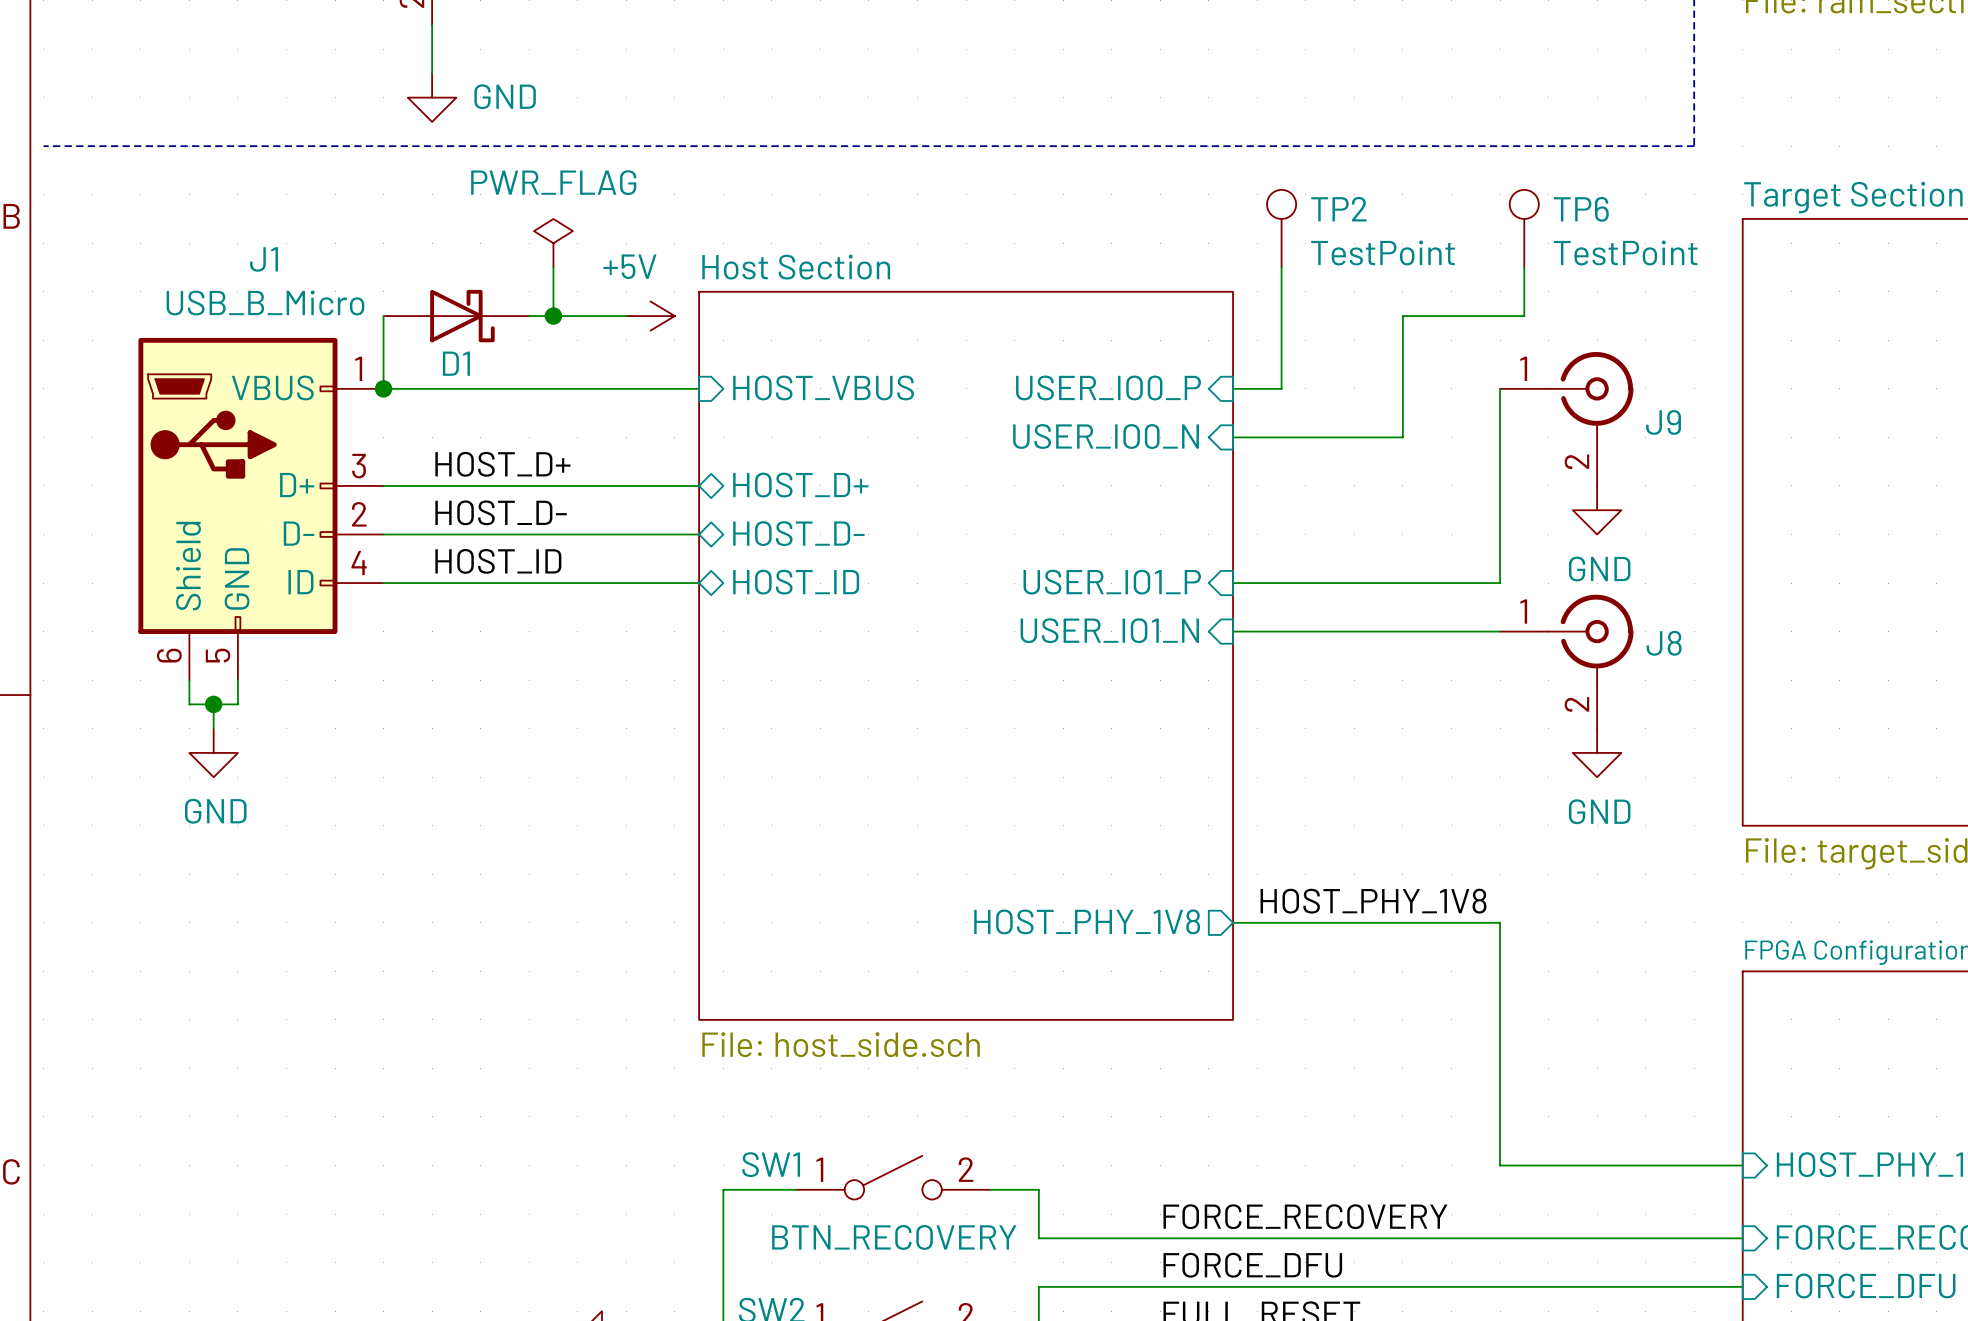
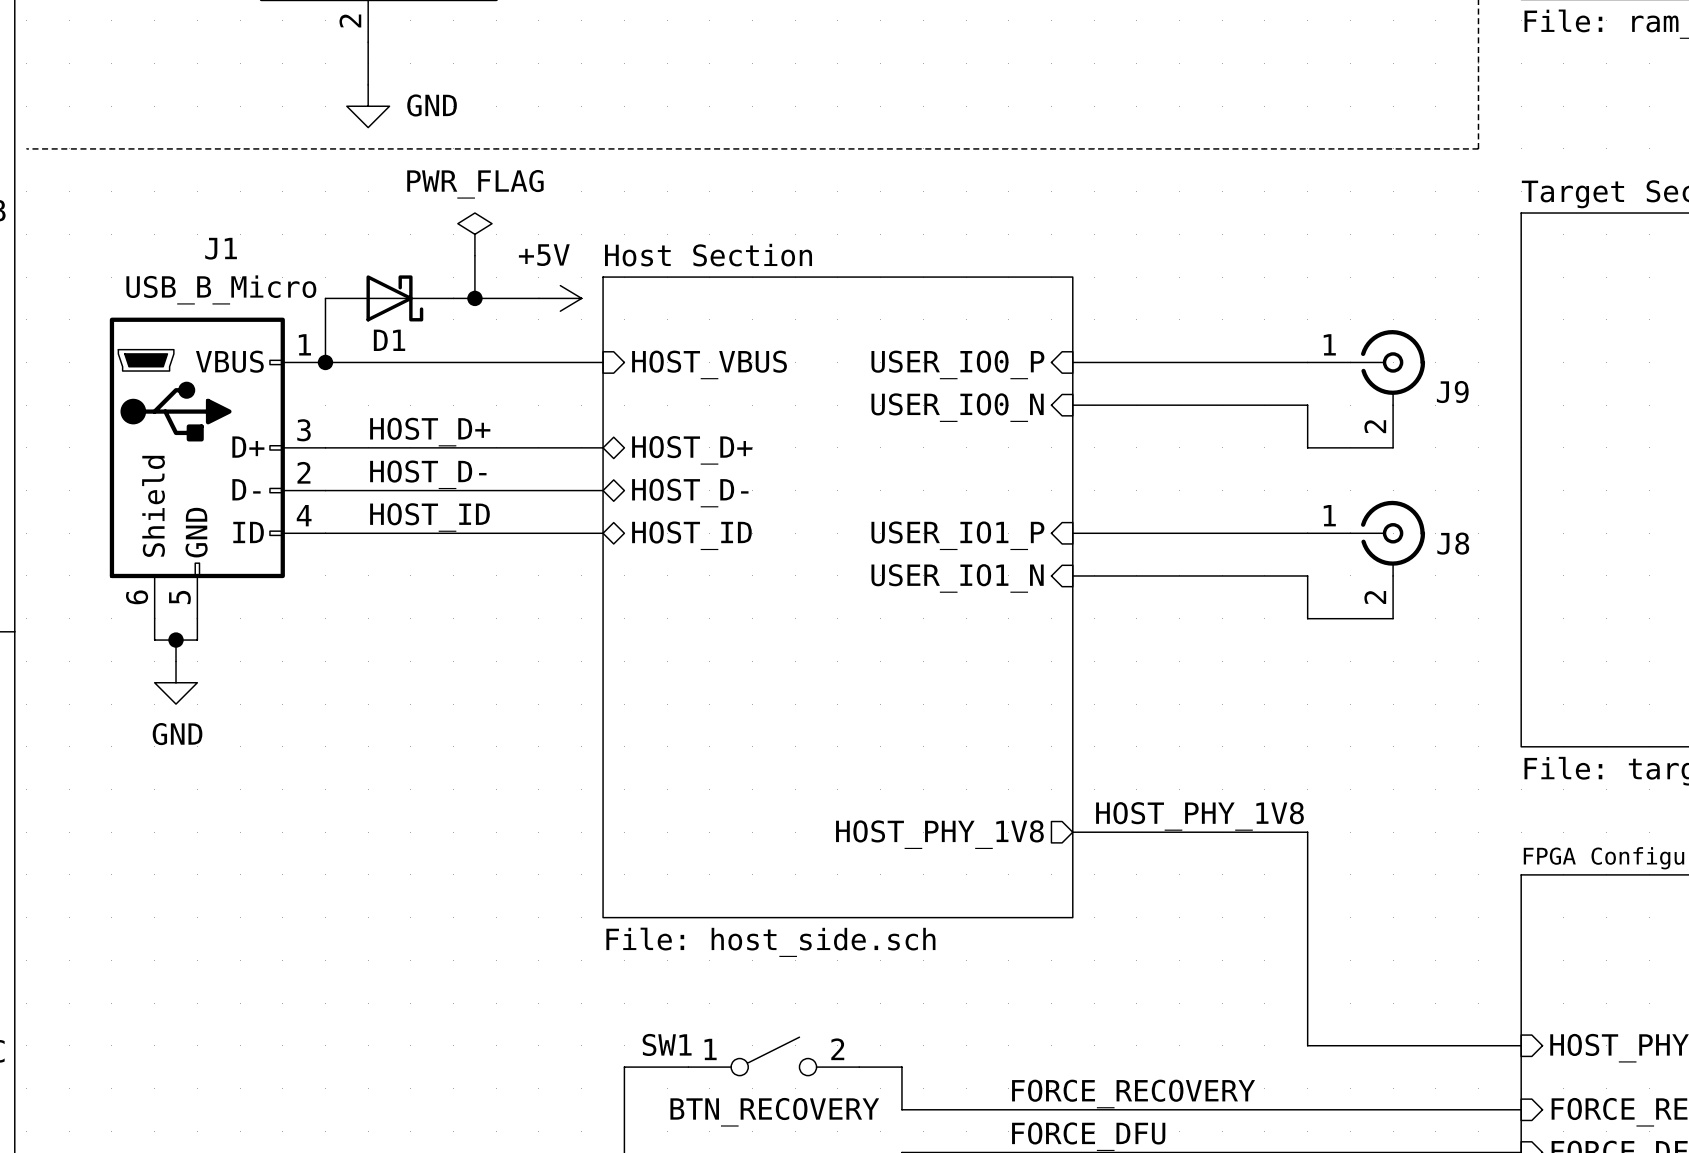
TP2: TestPoint (1281, 228) -> none
TP6: TestPoint (1524, 228) -> none
wire: (1281, 267) (1281, 388) -> (1307, 362) (1115, 362)
wire: (1524, 267) (1524, 316) (1402, 316) (1402, 437) -> none
wire: (1500, 388) (1500, 437) -> (1222, 405) (1307, 405)
wire: (1500, 485) (1500, 583) -> (1307, 447) (1393, 447)
power symbol: GND (1597, 510) -> none
wire: none -> (1307, 575) (1307, 618) (1393, 618)
J8 position: (1566, 661) -> (1366, 559)
power symbol: GND (1597, 752) -> none

